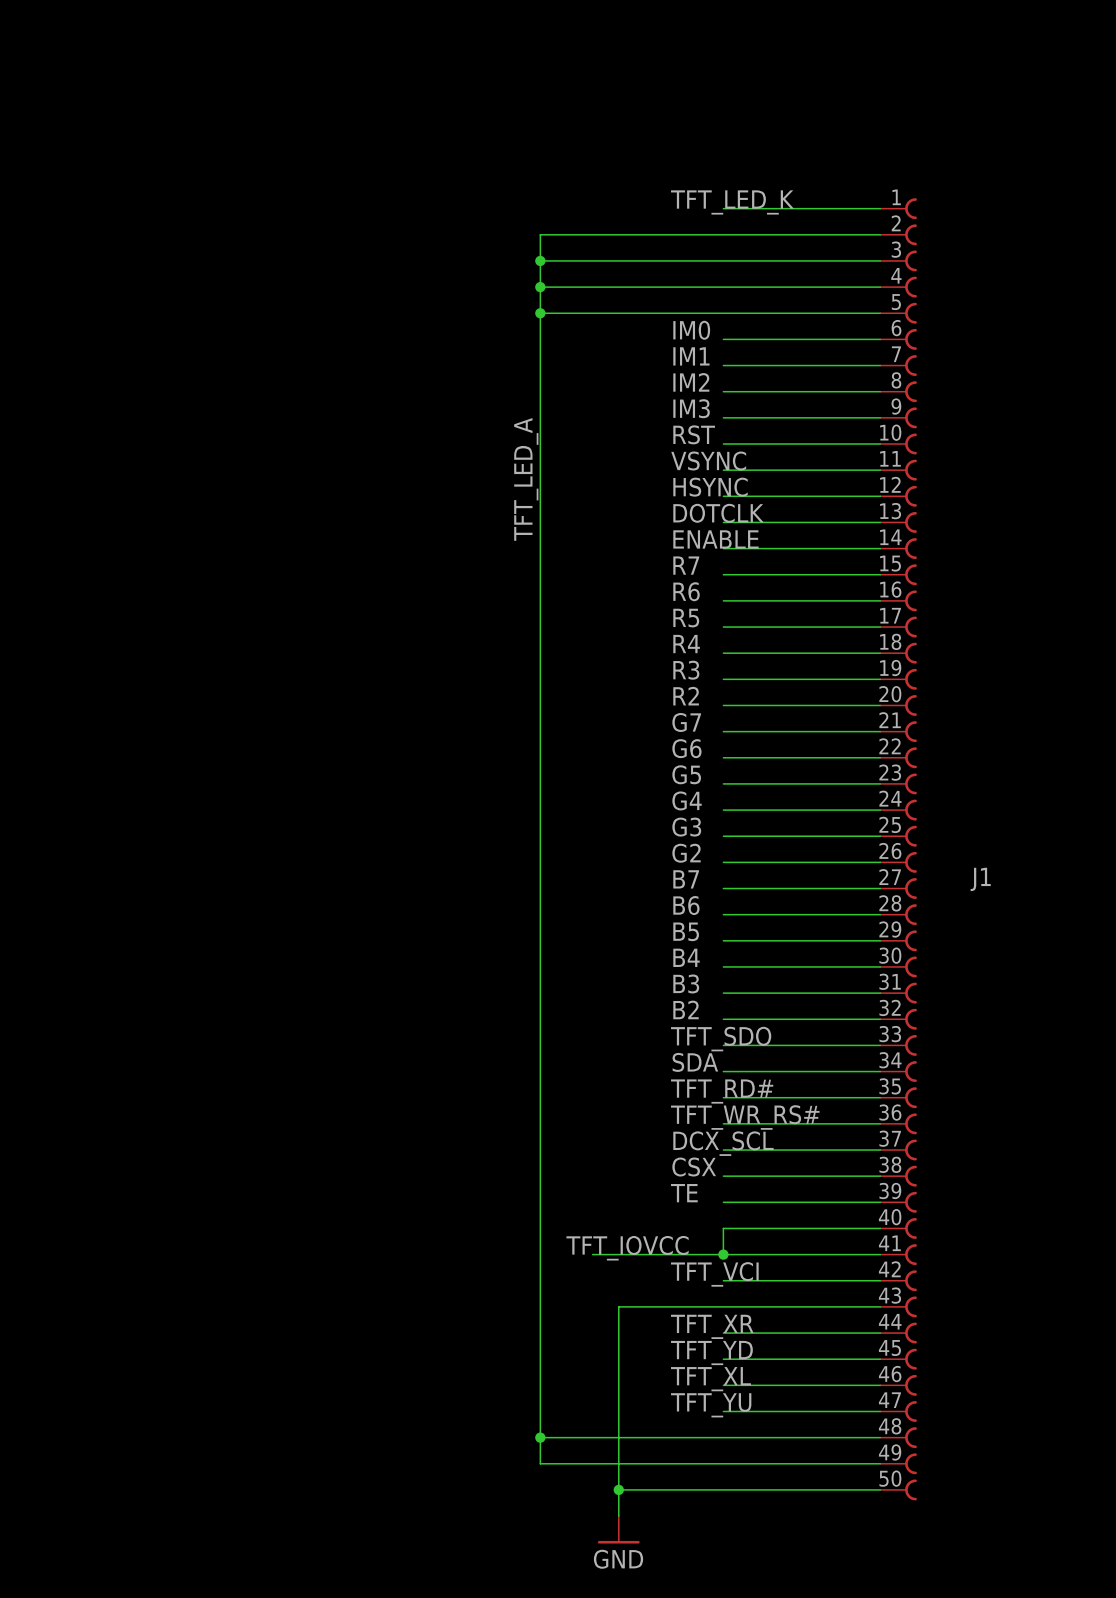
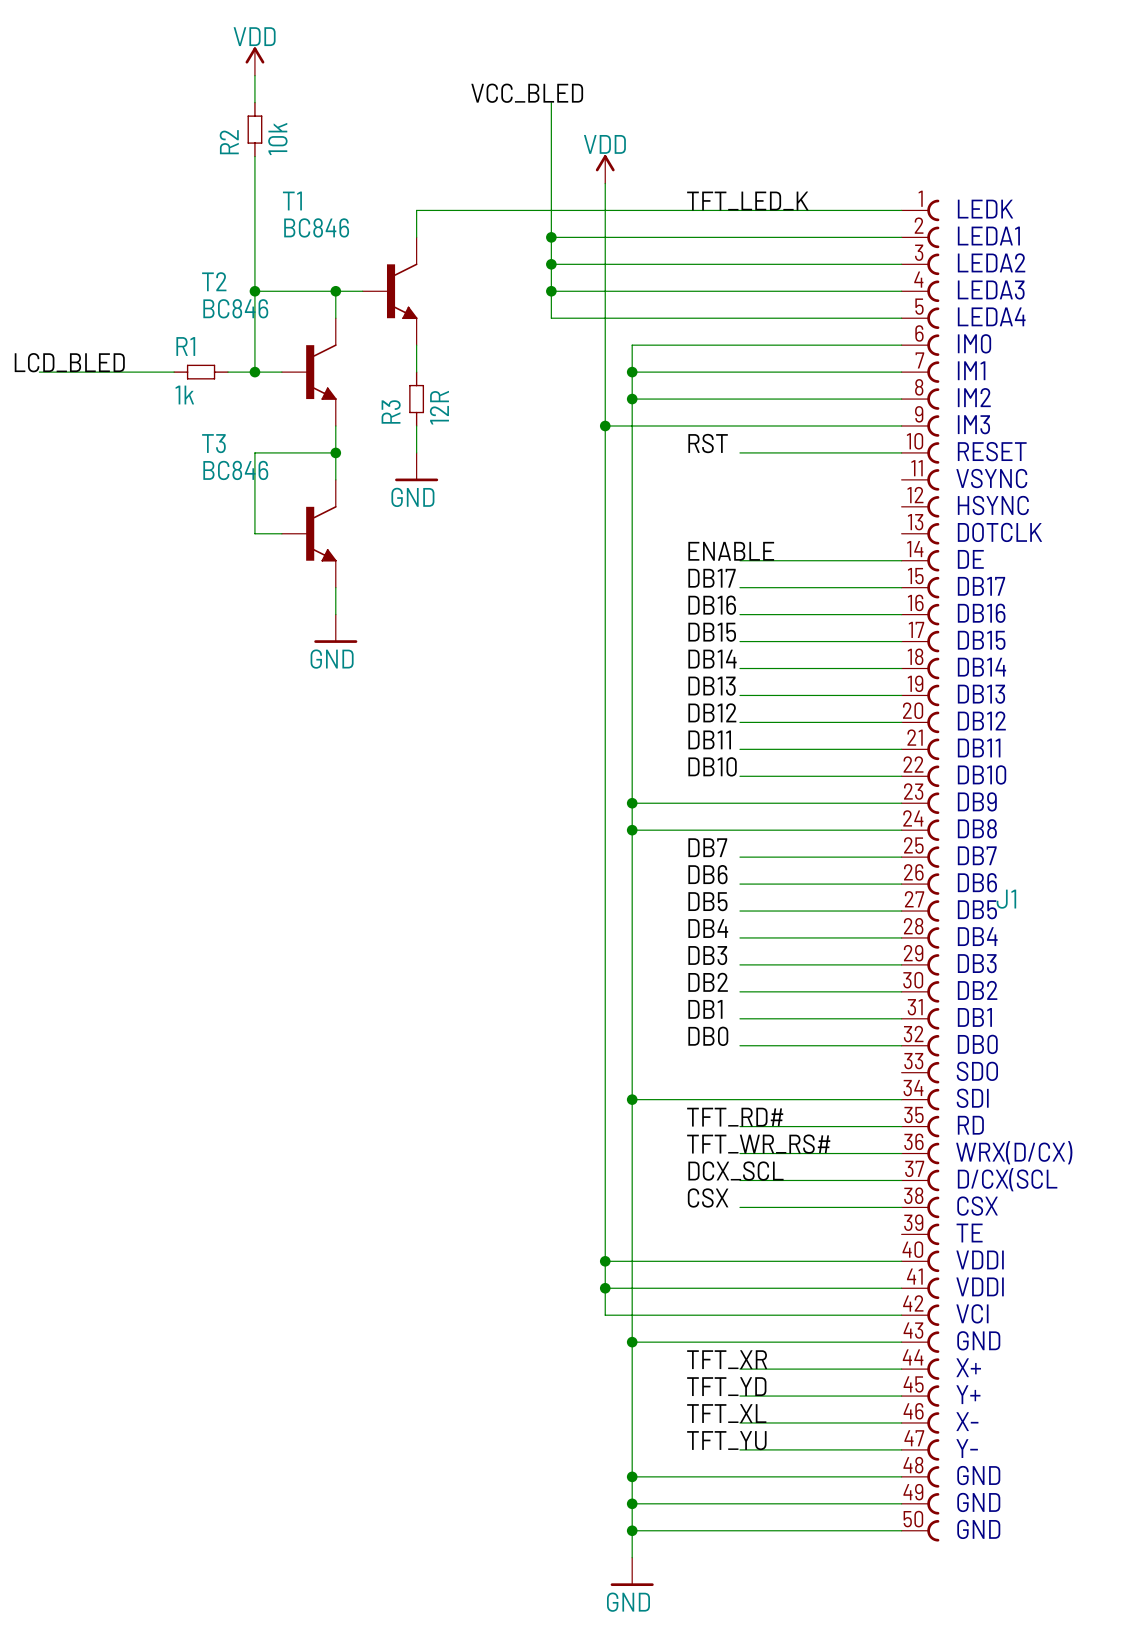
power symbol: none -> VDD (254, 61)
wire: none -> (254, 75) (254, 102)
label: none -> VCC_BLED (527, 93)
wire: none -> (551, 102) (551, 237)
R2: none -> 10k (254, 129)
wire: none -> (254, 156) (254, 372)
power symbol: none -> VDD (605, 169)
wire: none -> (605, 183) (605, 1315) (739, 1315)
text: none -> LEDK (985, 209)
wire: none -> (739, 210) (416, 210) (416, 237)
text: none -> LEDA1 (988, 236)
junction: none -> (551, 237)
text: none -> LEDA2 (991, 262)
text: none -> LEDA3 (991, 290)
wire: none -> (254, 291) (362, 291)
junction: none -> (254, 291)
wire: none -> (335, 291) (335, 318)
junction: none -> (335, 291)
T1: none -> BC846 (390, 291)
text: none -> LEDA4 (991, 316)
wire: (540, 313) (540, 1463) (618, 1463) -> none
junction: (540, 313) -> none
label: IM0 (691, 330) -> none
text: none -> IM0 (974, 343)
wire: none -> (416, 345) (416, 372)
wire: none -> (739, 345) (632, 345) (632, 1342)
label: IM1 (691, 356) -> none
label: none -> LCD_BLED (69, 362)
text: none -> IM1 (971, 370)
wire: none -> (39, 372) (174, 372)
R1: none -> 1k (201, 372)
wire: none -> (228, 372) (281, 372)
junction: none -> (254, 372)
T2: none -> BC846 (309, 372)
wire: none -> (632, 372) (739, 372)
junction: none -> (632, 372)
label: IM2 (691, 382) -> none
text: none -> IM2 (974, 397)
R3: none -> 12R (416, 399)
wire: none -> (632, 399) (739, 399)
junction: none -> (632, 399)
label: IM3 (691, 408) -> none
text: none -> IM3 (973, 424)
wire: none -> (335, 425) (335, 479)
wire: none -> (416, 425) (416, 452)
wire: none -> (605, 425) (739, 425)
junction: none -> (605, 425)
text: none -> RESET (992, 451)
wire: none -> (335, 452) (254, 452) (254, 533) (281, 533)
junction: none -> (335, 452)
power symbol: none -> GND (416, 467)
label: VSYNC (708, 461) -> none
text: none -> VSYNC (991, 478)
wire: (723, 470) (880, 470) -> none
label: TFT_LED_A (526, 479) -> none
label: HSYNC (710, 487) -> none
text: none -> HSYNC (993, 505)
wire: (723, 496) (880, 496) -> none
label: DOTCLK (718, 513) -> none
text: none -> DOTCLK (999, 532)
T3: none -> BC846 (309, 533)
wire: (723, 522) (880, 522) -> none
text: none -> DE (970, 559)
label: R7 (686, 565) -> DB17 (712, 578)
text: none -> DB17 (981, 586)
wire: none -> (335, 587) (335, 614)
label: R6 (686, 591) -> DB16 (712, 605)
text: none -> DB16 (981, 613)
power symbol: none -> GND (335, 628)
label: R5 (686, 618) -> DB15 (712, 632)
text: none -> DB15 (981, 640)
label: R4 (686, 644) -> DB14 (712, 659)
text: none -> DB14 (981, 667)
label: R3 (686, 670) -> DB13 (712, 686)
text: none -> DB13 (981, 694)
label: R2 (686, 696) -> DB12 (712, 712)
text: none -> DB12 (981, 720)
label: G7 (686, 722) -> DB11 (709, 739)
text: none -> DB11 (979, 747)
label: G6 (686, 748) -> DB10 (712, 766)
text: none -> DB10 (982, 774)
label: G5 (686, 774) -> none
text: none -> DB9 (977, 801)
wire: none -> (632, 803) (739, 803)
junction: none -> (632, 803)
label: G4 (687, 800) -> none
text: none -> DB8 (977, 828)
wire: none -> (632, 830) (739, 830)
junction: none -> (632, 830)
label: G3 (686, 827) -> DB7 (707, 847)
text: none -> DB7 (977, 855)
label: G2 (686, 853) -> DB6 (707, 874)
text: none -> DB6 (977, 882)
label: B7 (686, 879) -> DB5 (707, 901)
text: none -> DB5 (977, 909)
label: B6 (686, 905) -> DB4 (708, 928)
text: none -> DB4 (977, 936)
label: B5 (686, 931) -> DB3 (707, 955)
text: none -> DB3 (977, 963)
label: B4 (686, 957) -> DB2 (708, 982)
text: none -> DB2 (977, 990)
label: B3 (686, 983) -> DB1 (705, 1009)
text: none -> DB1 (974, 1017)
label: B2 (686, 1009) -> DB0 (708, 1036)
text: none -> DB0 (977, 1044)
label: TFT_SDO (721, 1039) -> none
text: none -> SDO (977, 1071)
wire: (723, 1045) (880, 1045) -> none
label: SDA (695, 1062) -> none
text: none -> SDI (972, 1098)
wire: none -> (632, 1099) (739, 1099)
junction: none -> (632, 1099)
text: none -> RD (970, 1125)
text: none -> WRX(D/CX) (1014, 1152)
text: none -> D/CX(SCL (1007, 1179)
text: none -> CSX (977, 1206)
label: TE (684, 1193) -> none
text: none -> TE (969, 1233)
wire: (723, 1202) (880, 1202) -> none
text: none -> VDDI (980, 1259)
junction: none -> (605, 1261)
wire: (723, 1228) (723, 1254) -> (739, 1261) (605, 1261)
label: TFT_IOVCC (627, 1248) -> none
text: none -> VDDI (980, 1286)
junction: none -> (605, 1288)
junction: (723, 1254) -> none
label: TFT_VCI (714, 1274) -> none
text: none -> VCI (972, 1313)
text: none -> GND (978, 1340)
junction: none -> (632, 1342)
text: none -> X+ (968, 1367)
text: none -> Y+ (968, 1394)
text: none -> X- (967, 1421)
text: none -> Y- (967, 1448)
text: none -> GND (978, 1475)
wire: (540, 1437) (618, 1437) -> none
junction: (540, 1437) -> none
junction: none -> (632, 1476)
text: none -> GND (978, 1502)
junction: none -> (632, 1503)
text: none -> GND (978, 1529)

